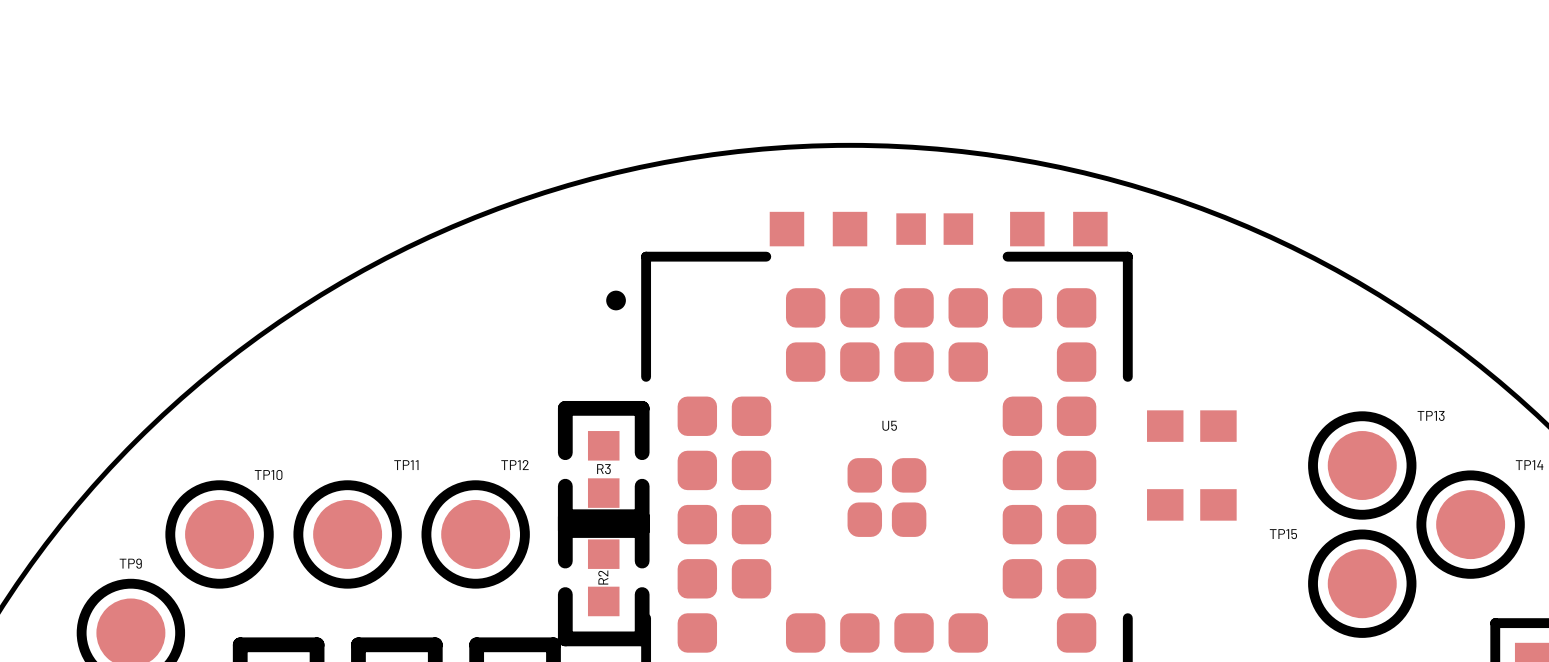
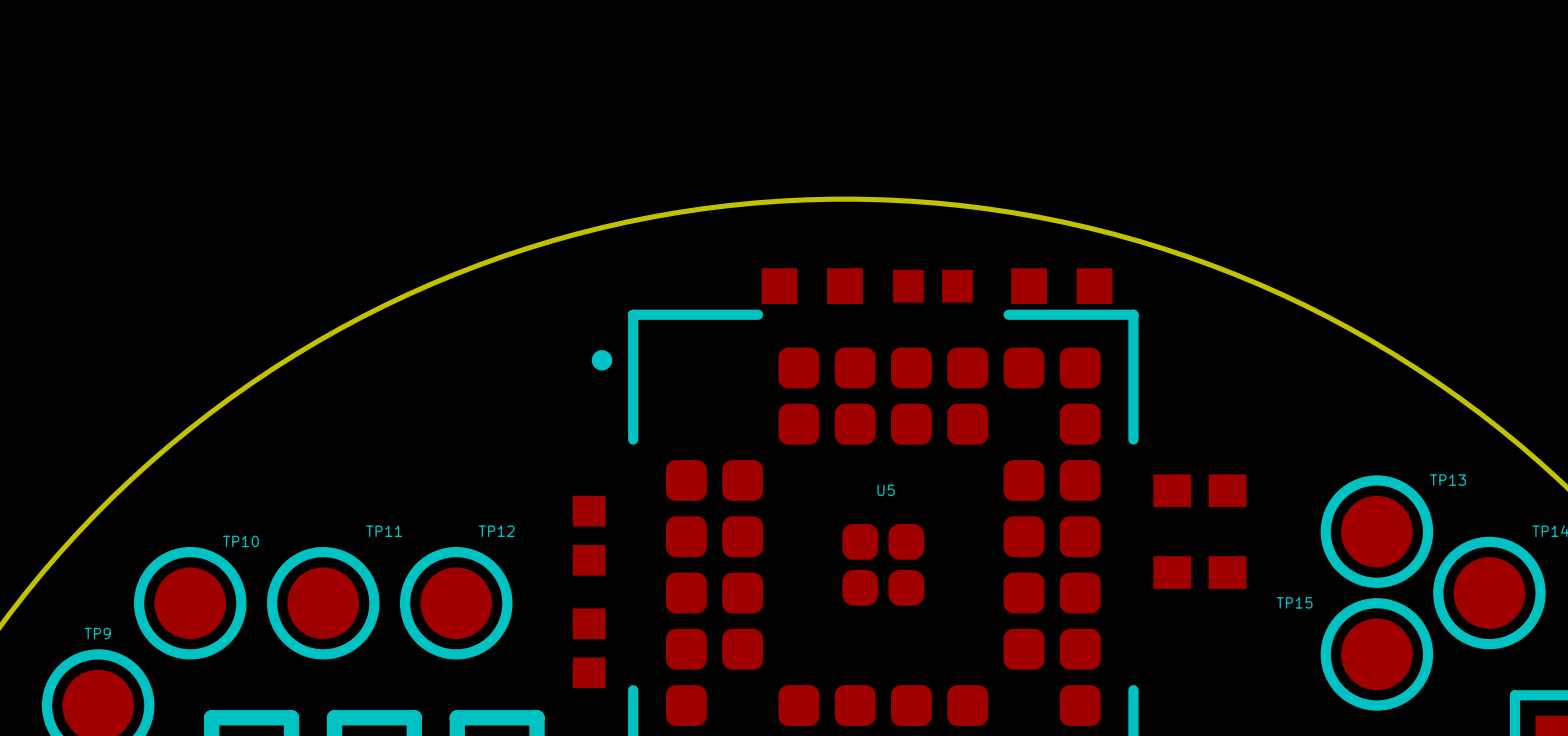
R3: (603, 469) -> none
part: none -> (589, 535)
R2: (603, 577) -> none
part: none -> (589, 648)

